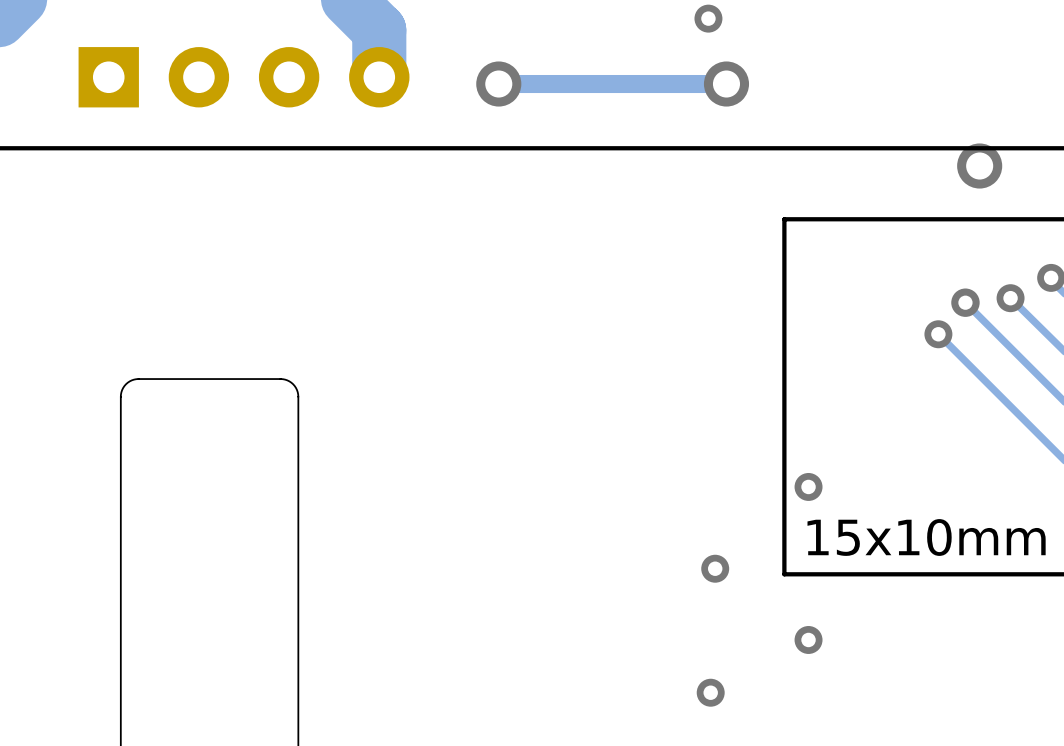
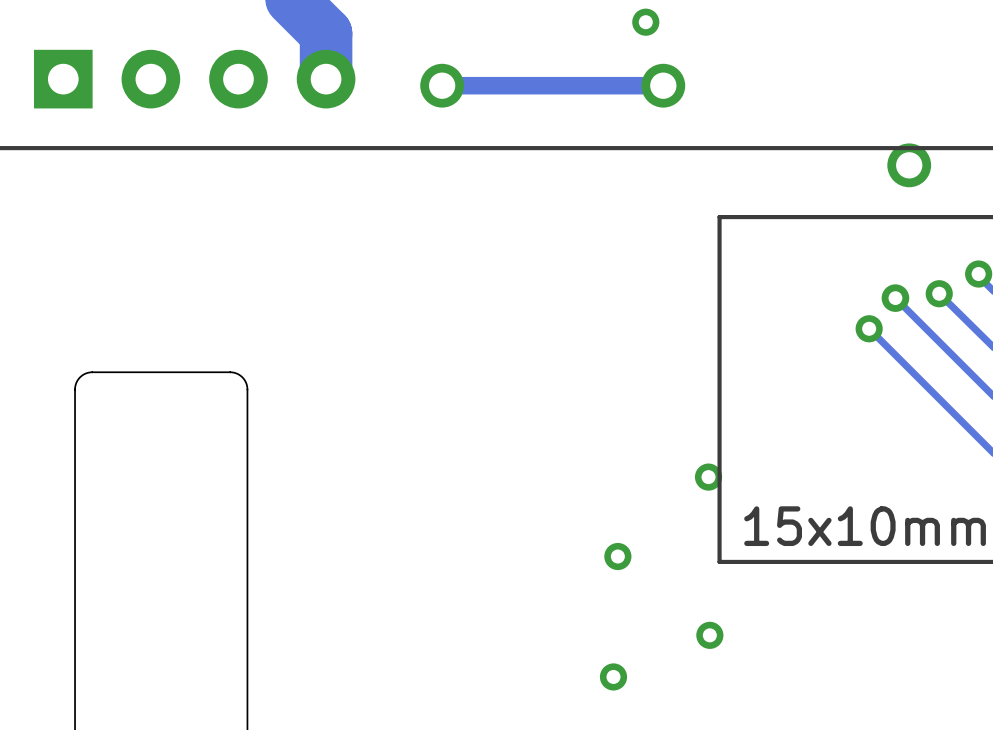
via position: (808, 486) -> (708, 477)
via position: (715, 568) -> (617, 556)
via position: (808, 639) -> (709, 635)
via position: (710, 692) -> (613, 676)

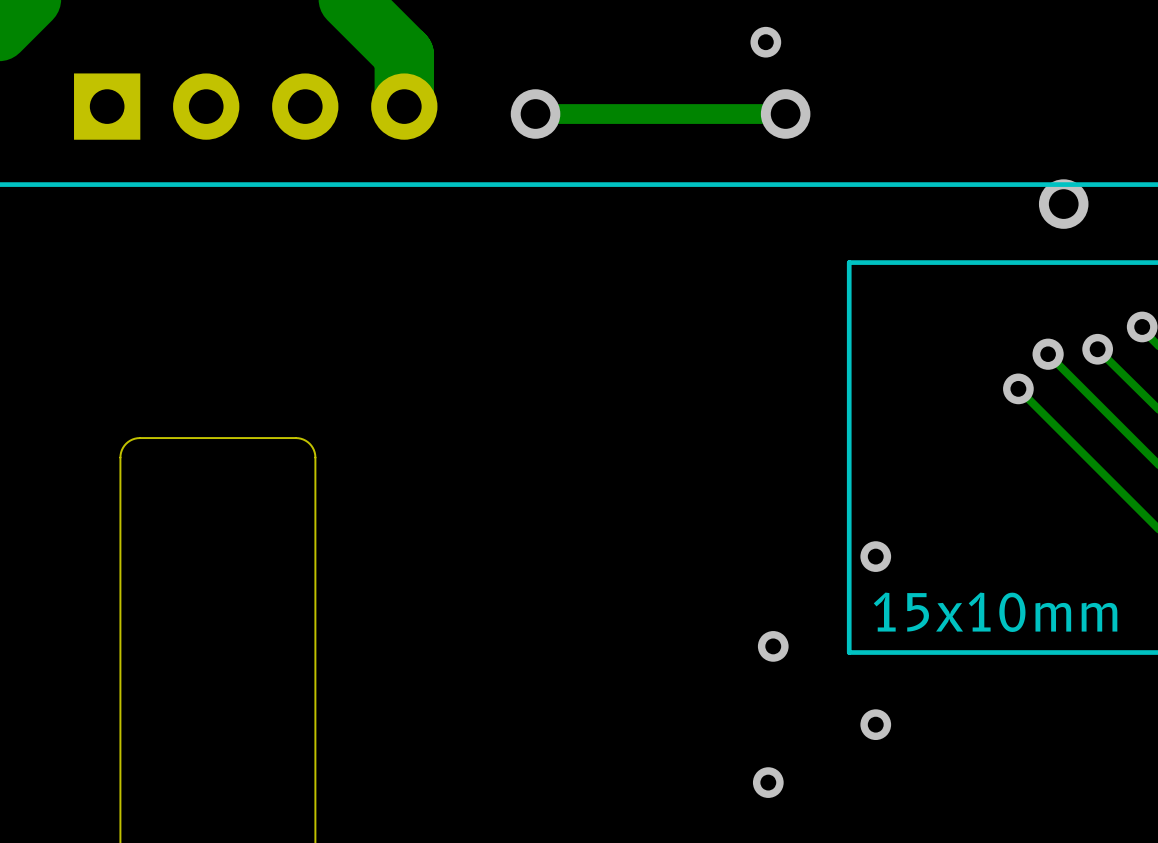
via position: (708, 477) -> (875, 556)
via position: (617, 556) -> (773, 646)
via position: (709, 635) -> (875, 724)
via position: (613, 676) -> (768, 782)

